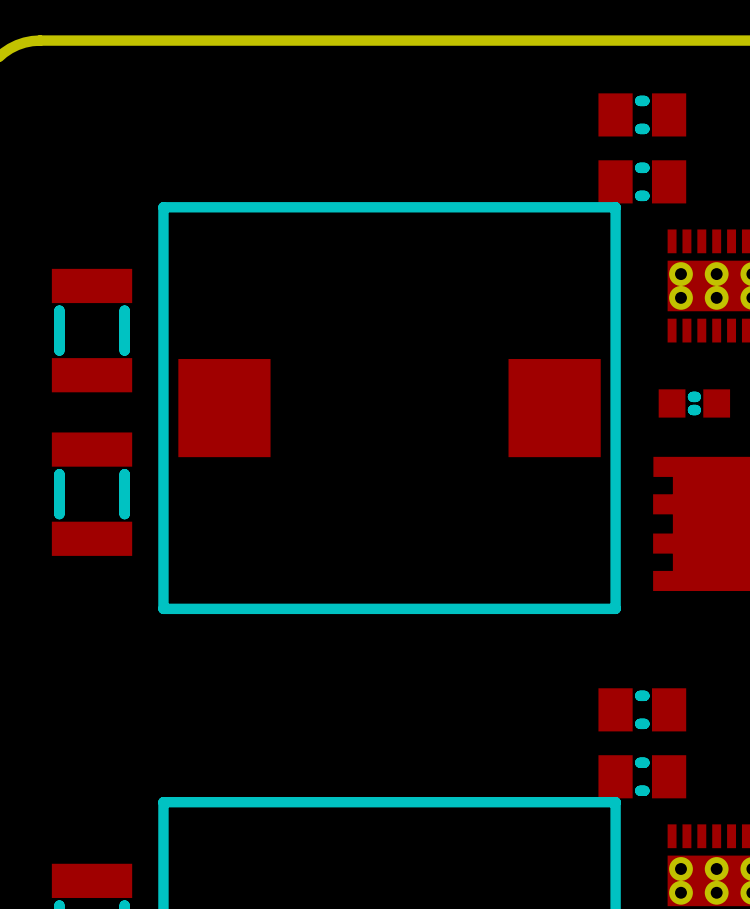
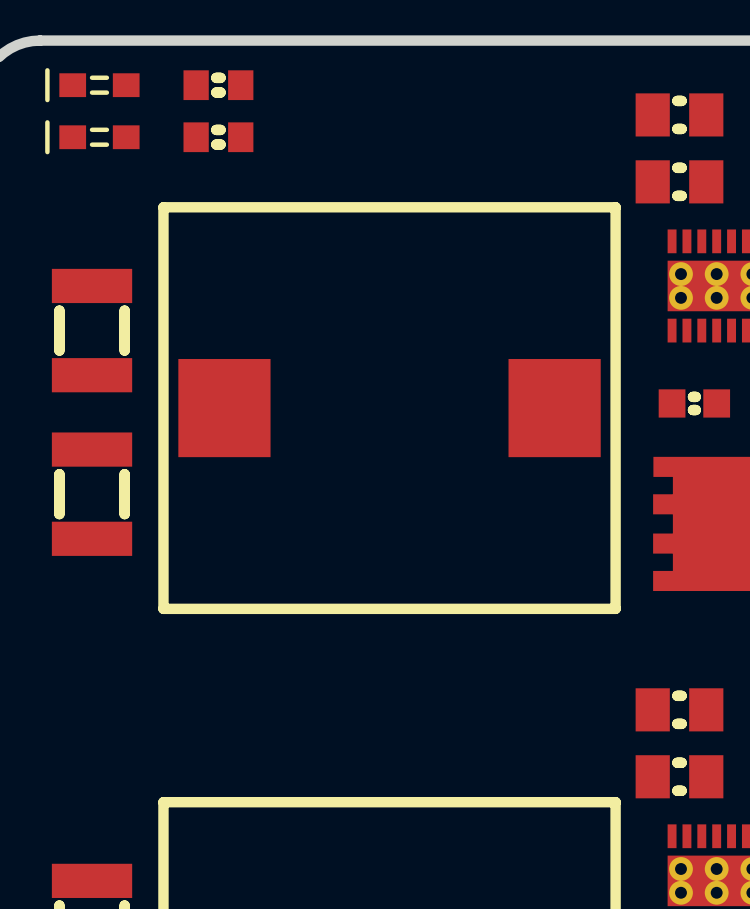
part: none -> (92, 85)
part: none -> (218, 85)
part position: (642, 114) -> (679, 114)
part: none -> (92, 137)
part: none -> (218, 137)
part position: (642, 181) -> (679, 181)
part position: (642, 709) -> (679, 709)
part position: (642, 776) -> (679, 776)

